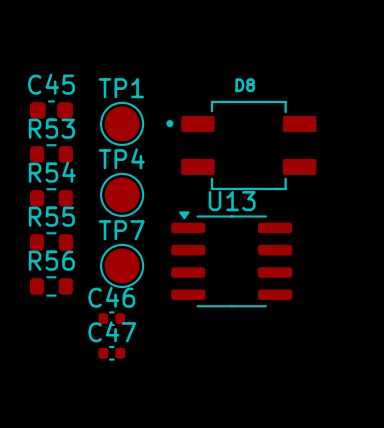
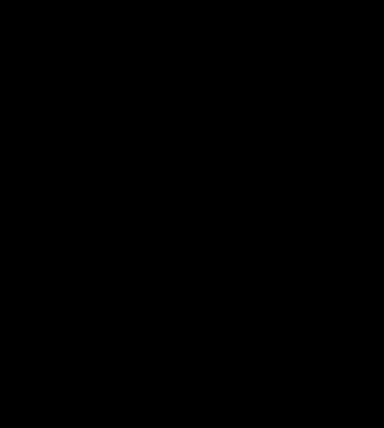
C45: (51, 110) -> none
TP1: (122, 123) -> none
D8: (241, 145) -> none
R53: (51, 154) -> none
TP4: (122, 194) -> none
R54: (51, 198) -> none
R55: (51, 242) -> none
U13: (231, 259) -> none
TP7: (122, 265) -> none
R56: (51, 286) -> none
C46: (111, 318) -> none
C47: (111, 353) -> none

